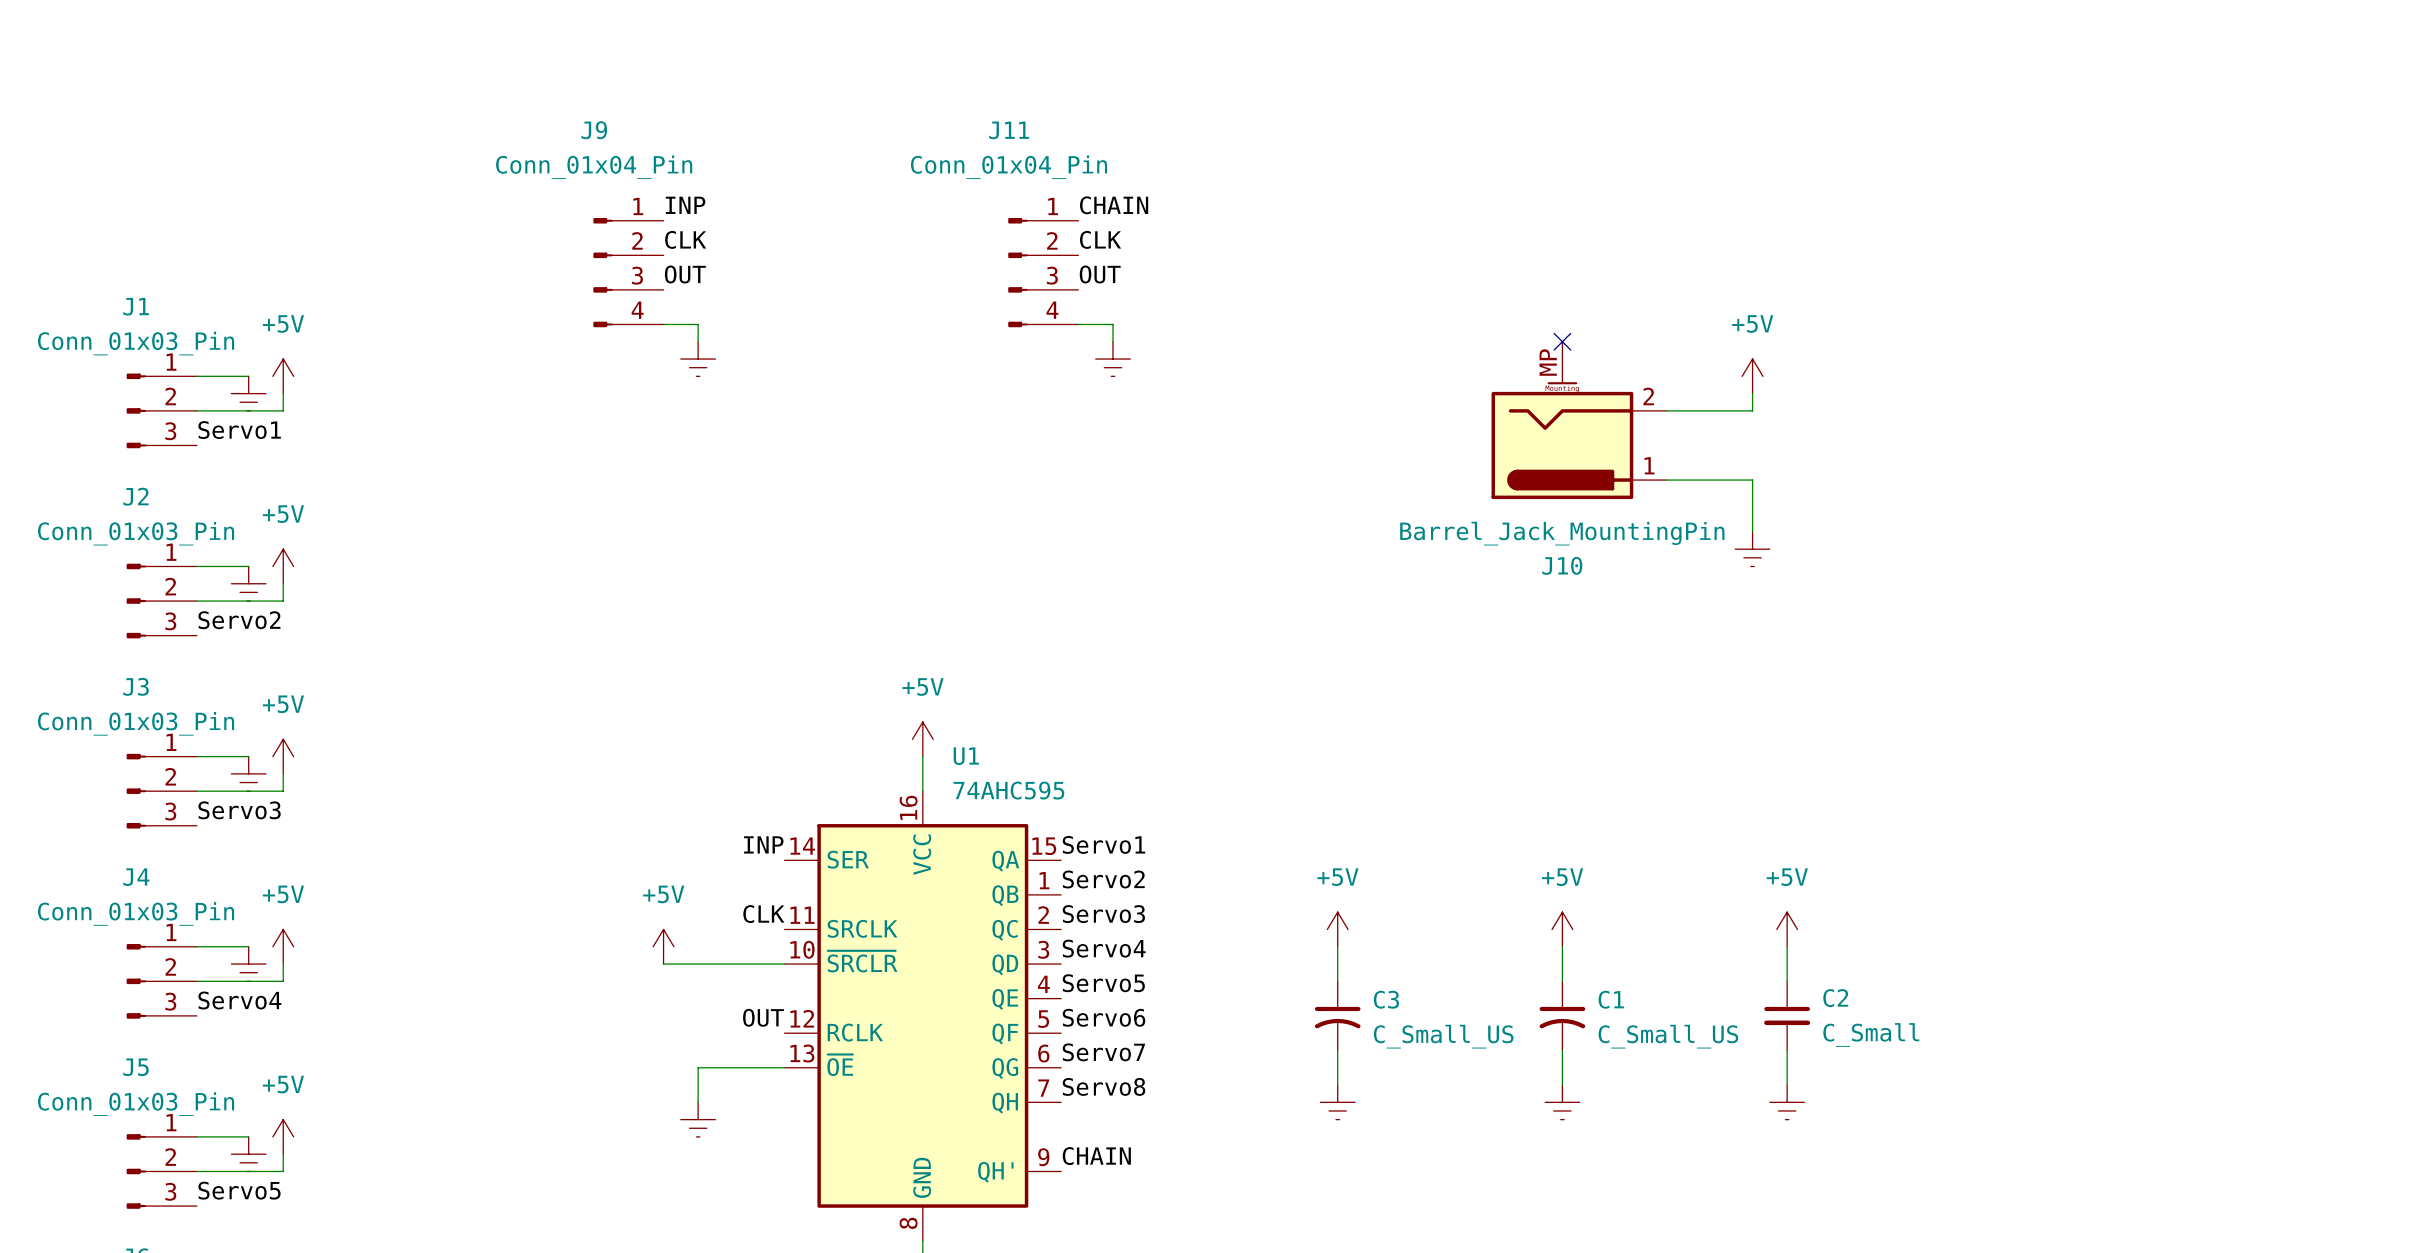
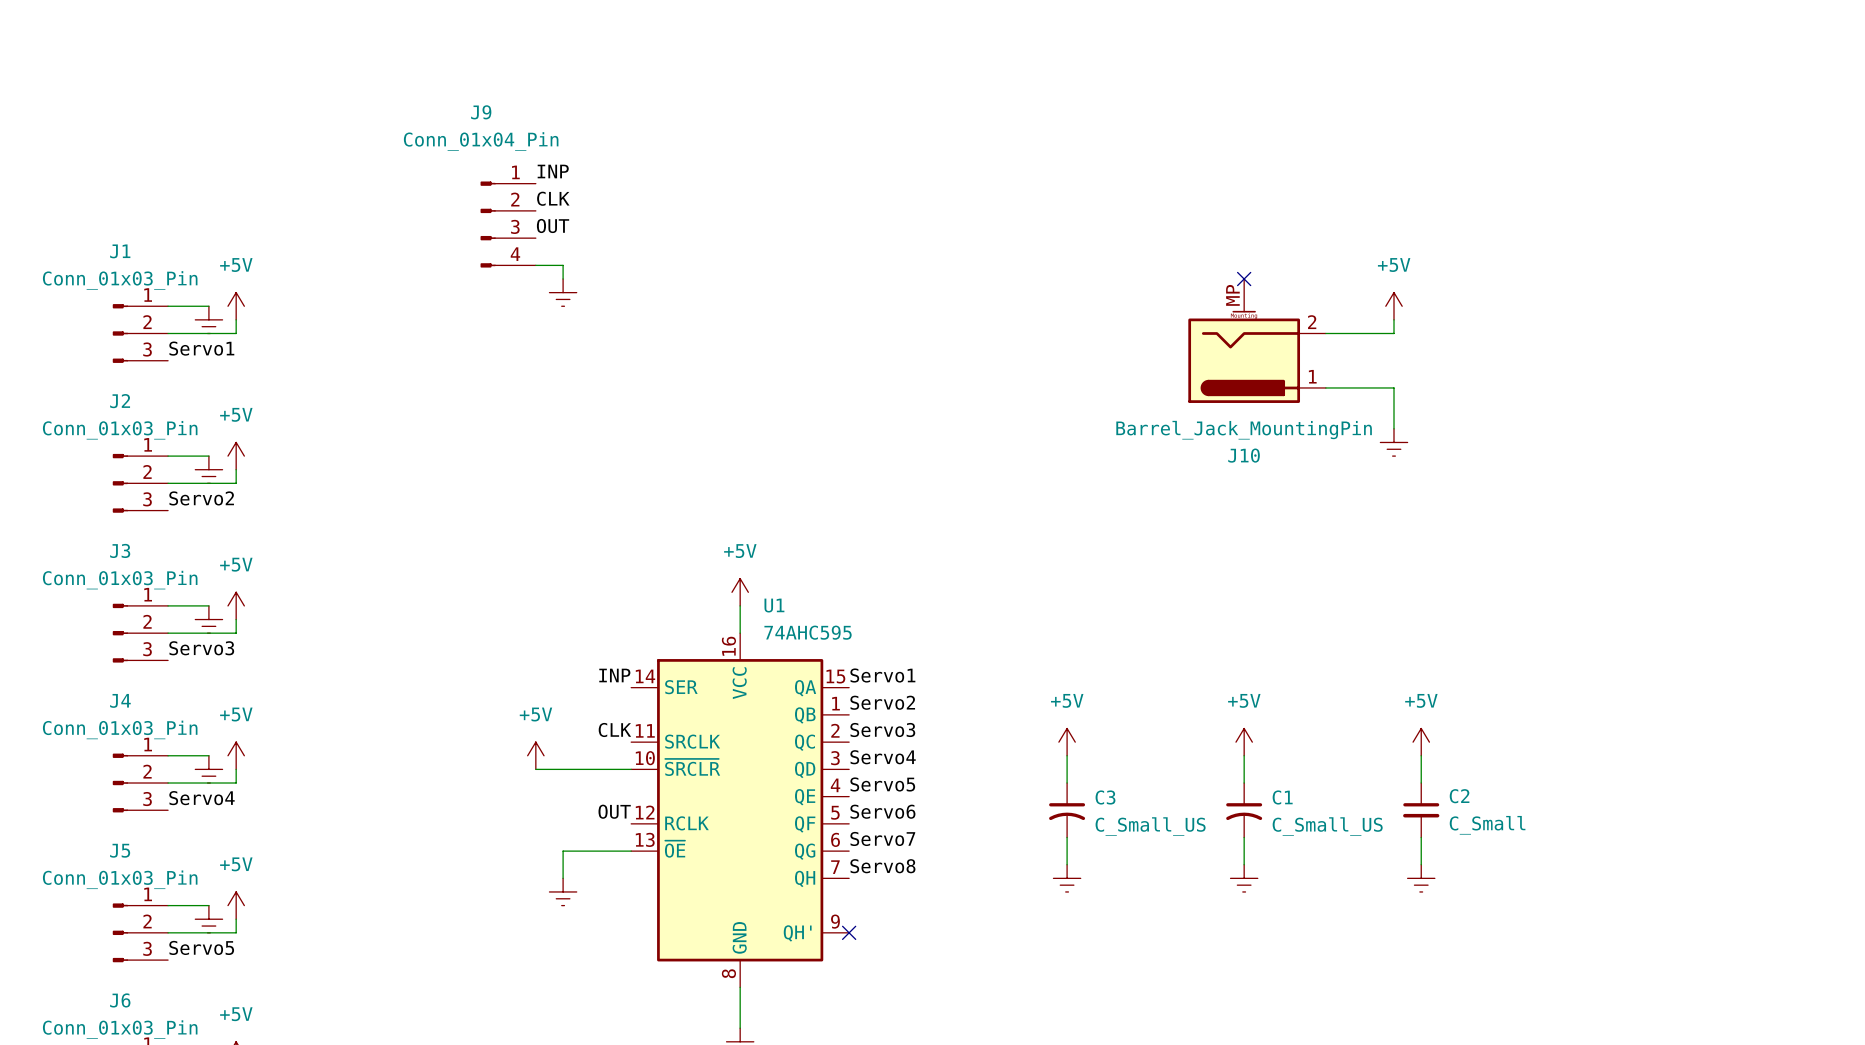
label: CHAIN (1114, 205) -> none
label: CLK (1100, 239) -> none
J11: Conn_01x04_Pin (1043, 272) -> none
label: OUT (1100, 274) -> none
wire: (1078, 324) (1112, 324) (1112, 341) -> none
power symbol: (1112, 359) -> none
label: CHAIN (1096, 1156) -> none
no-connect mark: none -> (849, 932)

